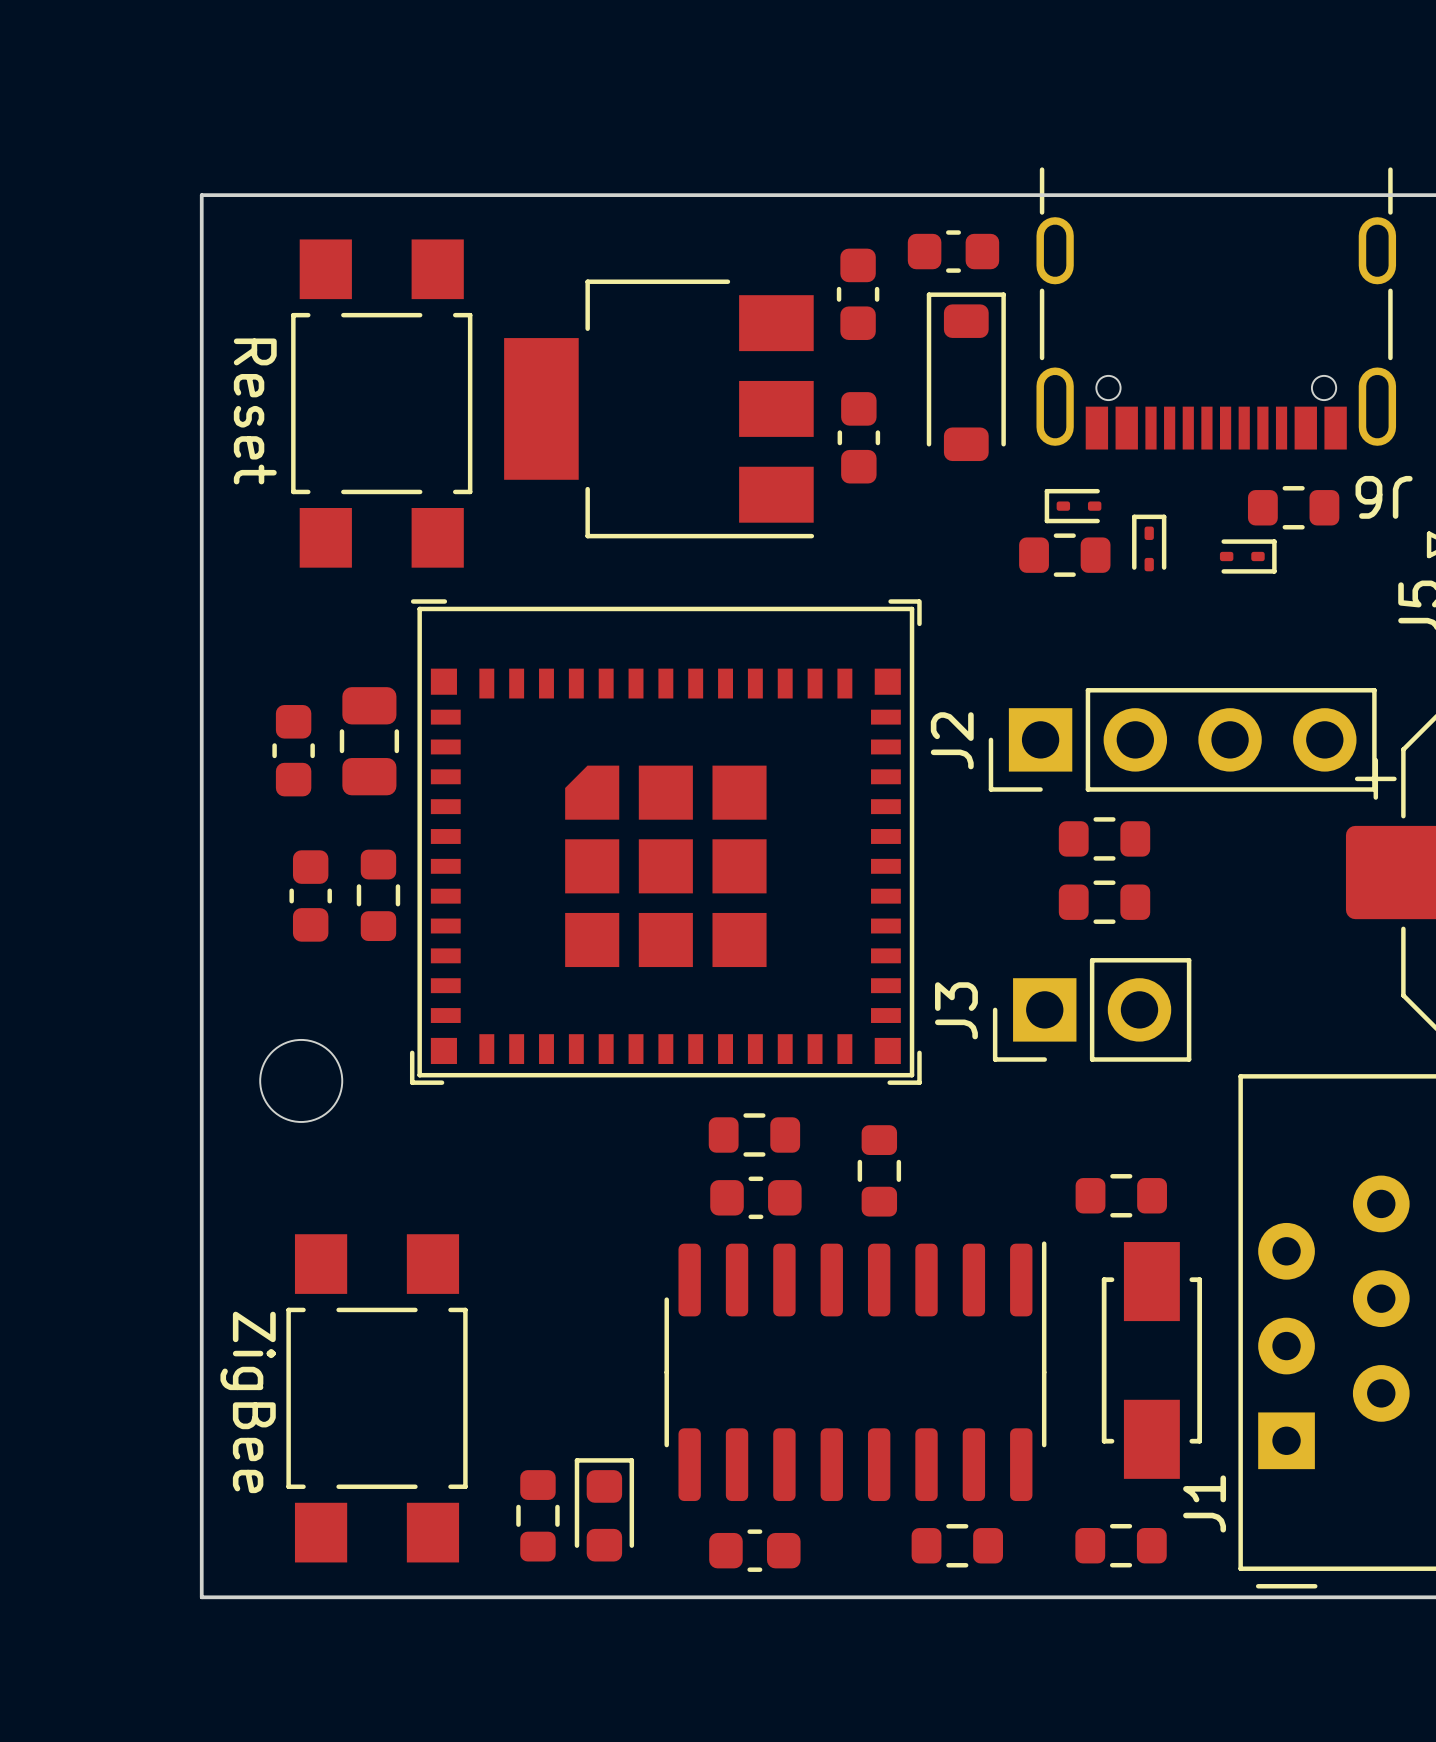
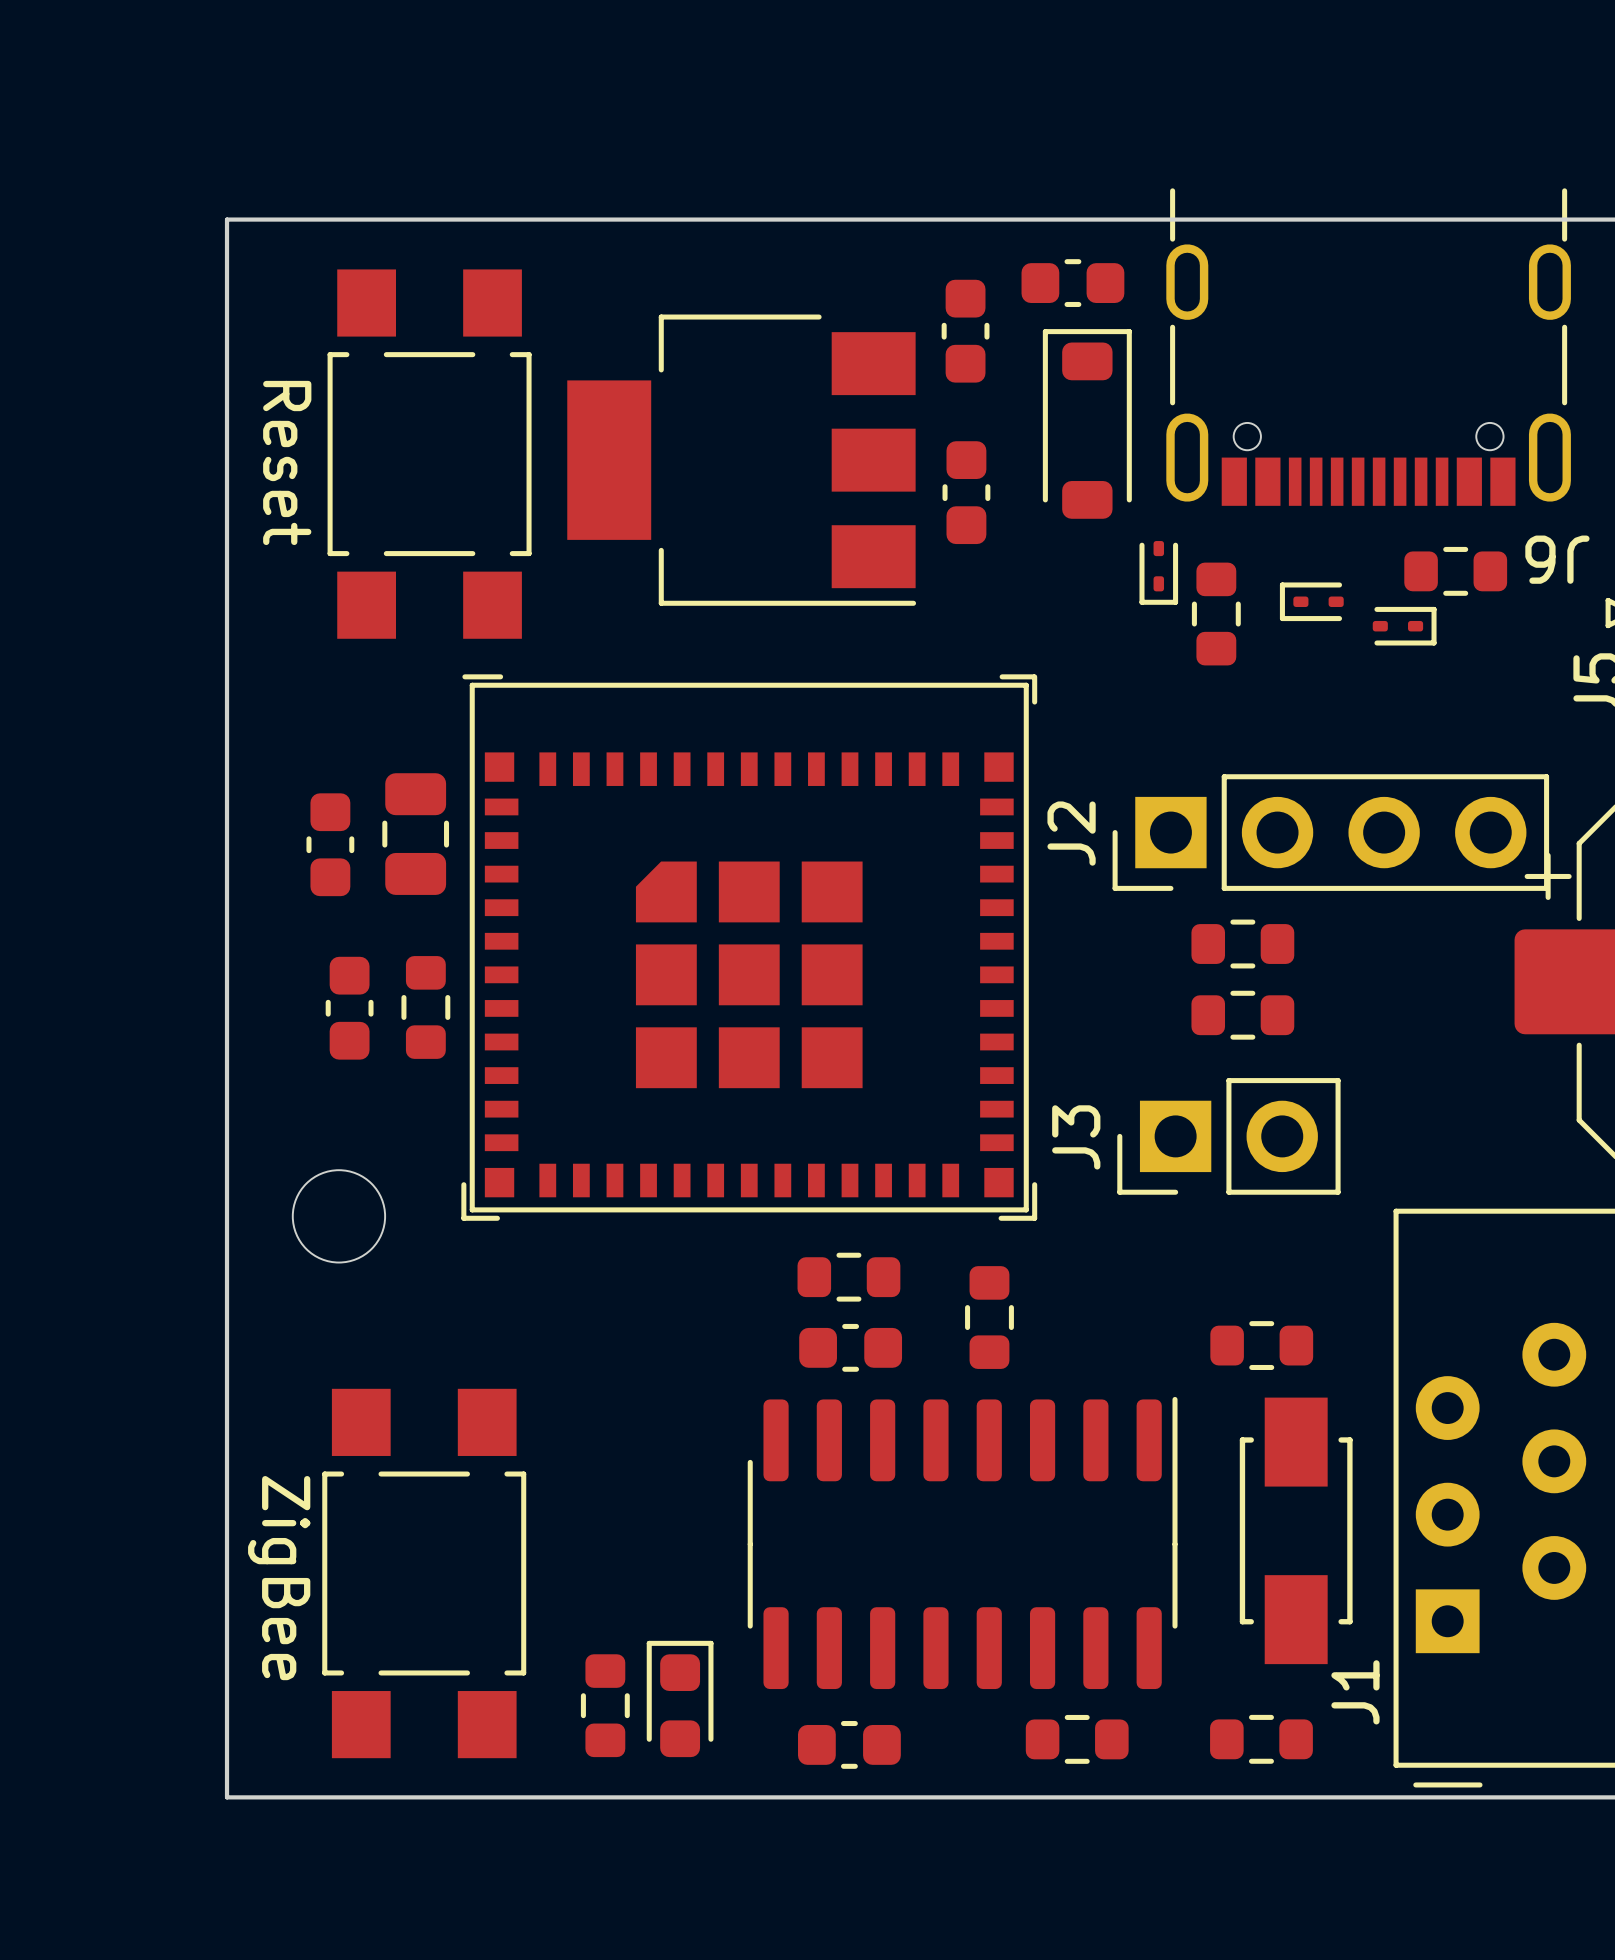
part rotation: 0° (1073, 506) -> 90° counterclockwise (1158, 572)
part position: (1073, 506) -> (1158, 572)
part rotation: 0° (1149, 542) -> 90° counterclockwise (1311, 601)
part rotation: 0° (1064, 555) -> 90° clockwise (1216, 614)

